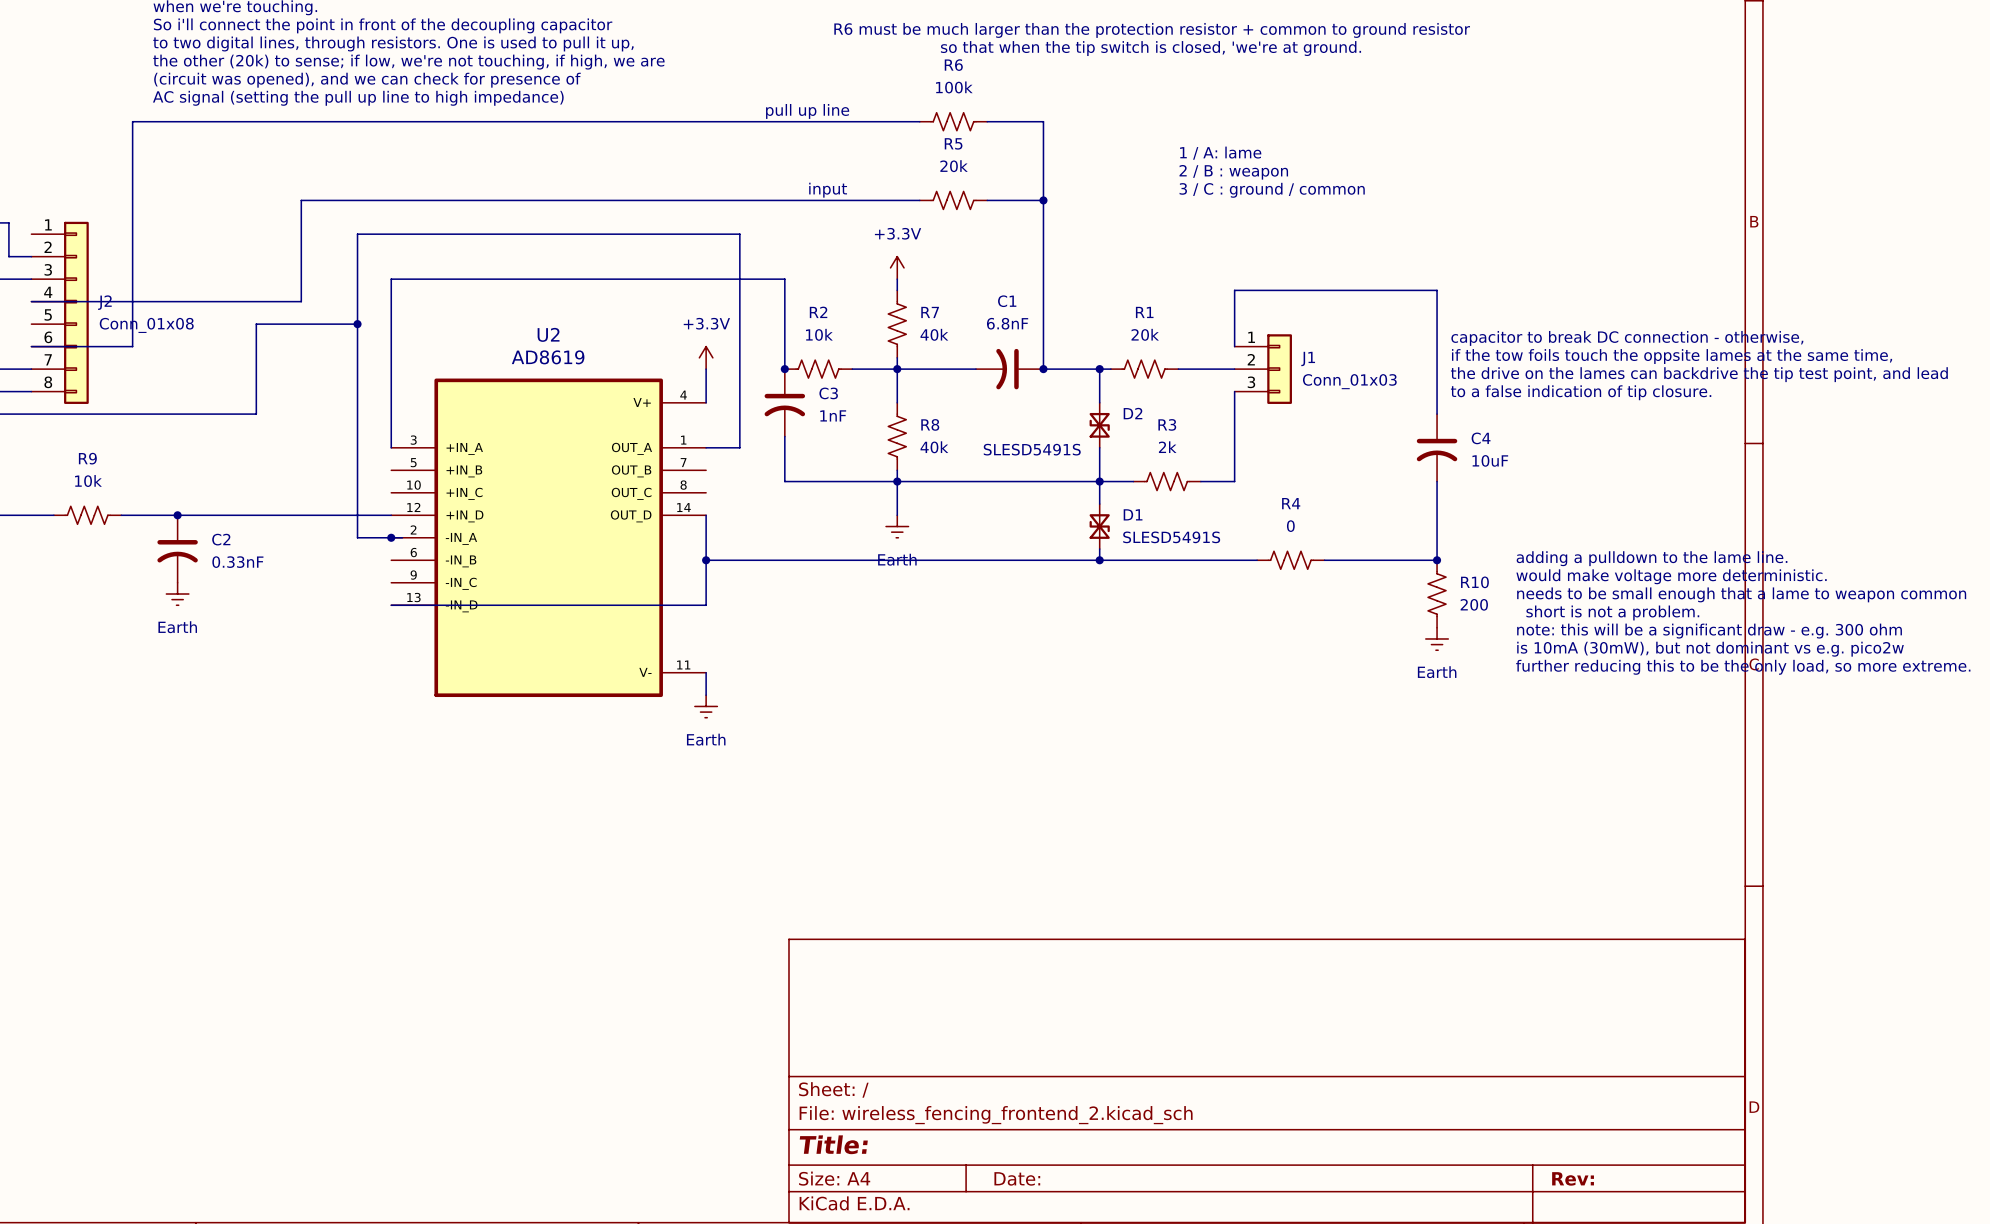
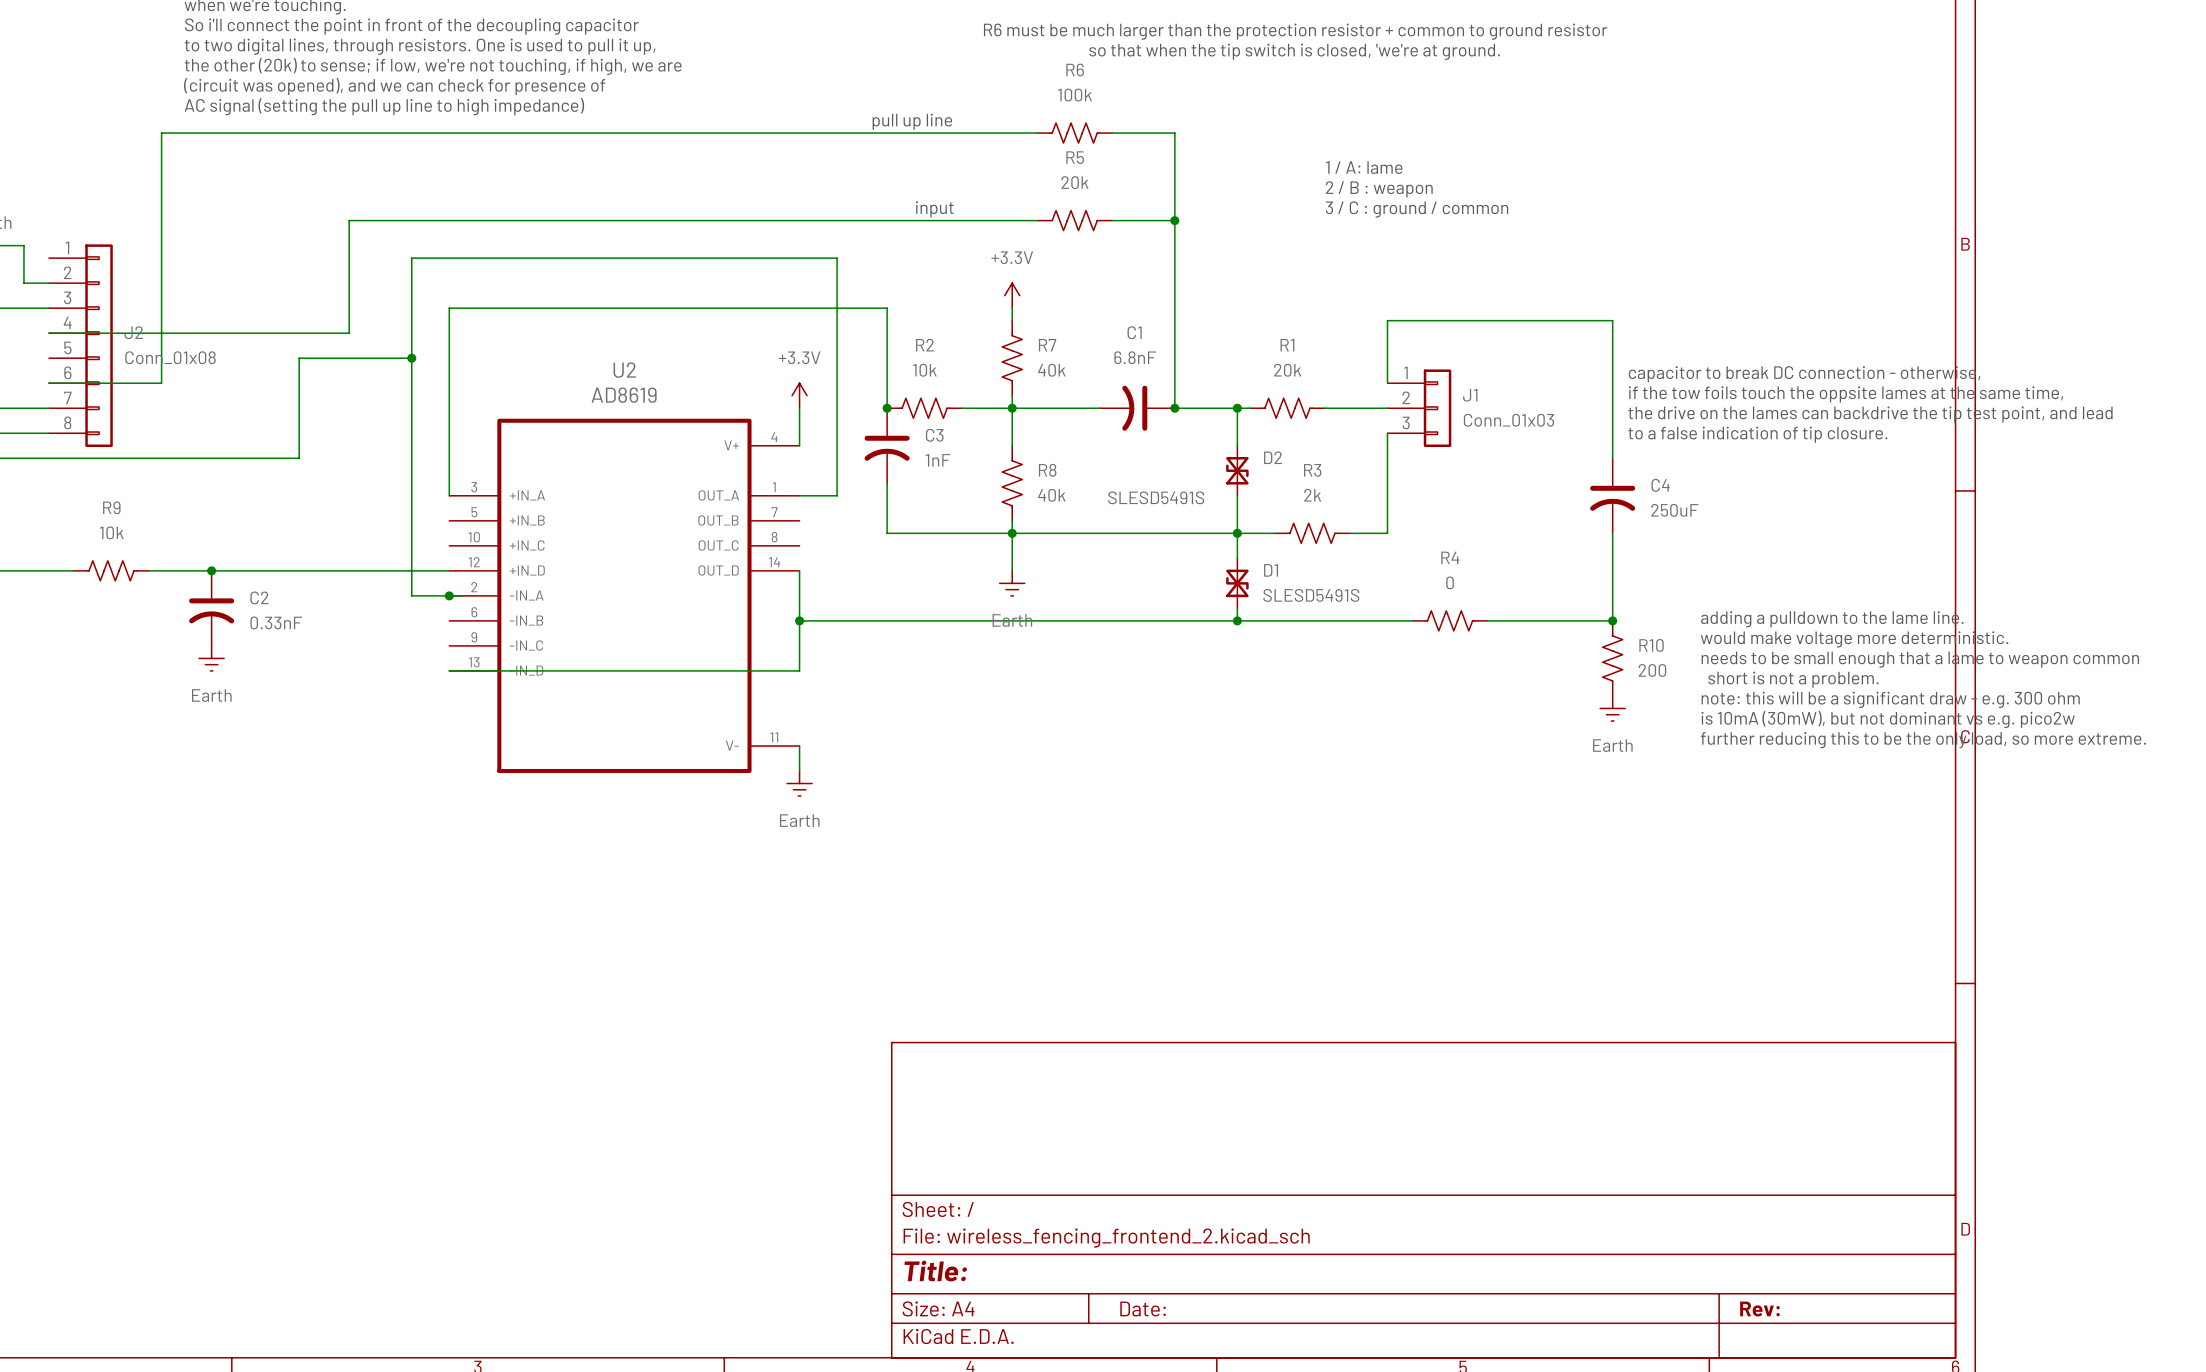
C4 value: 10uF (1490, 460) -> 250uF (1674, 510)

